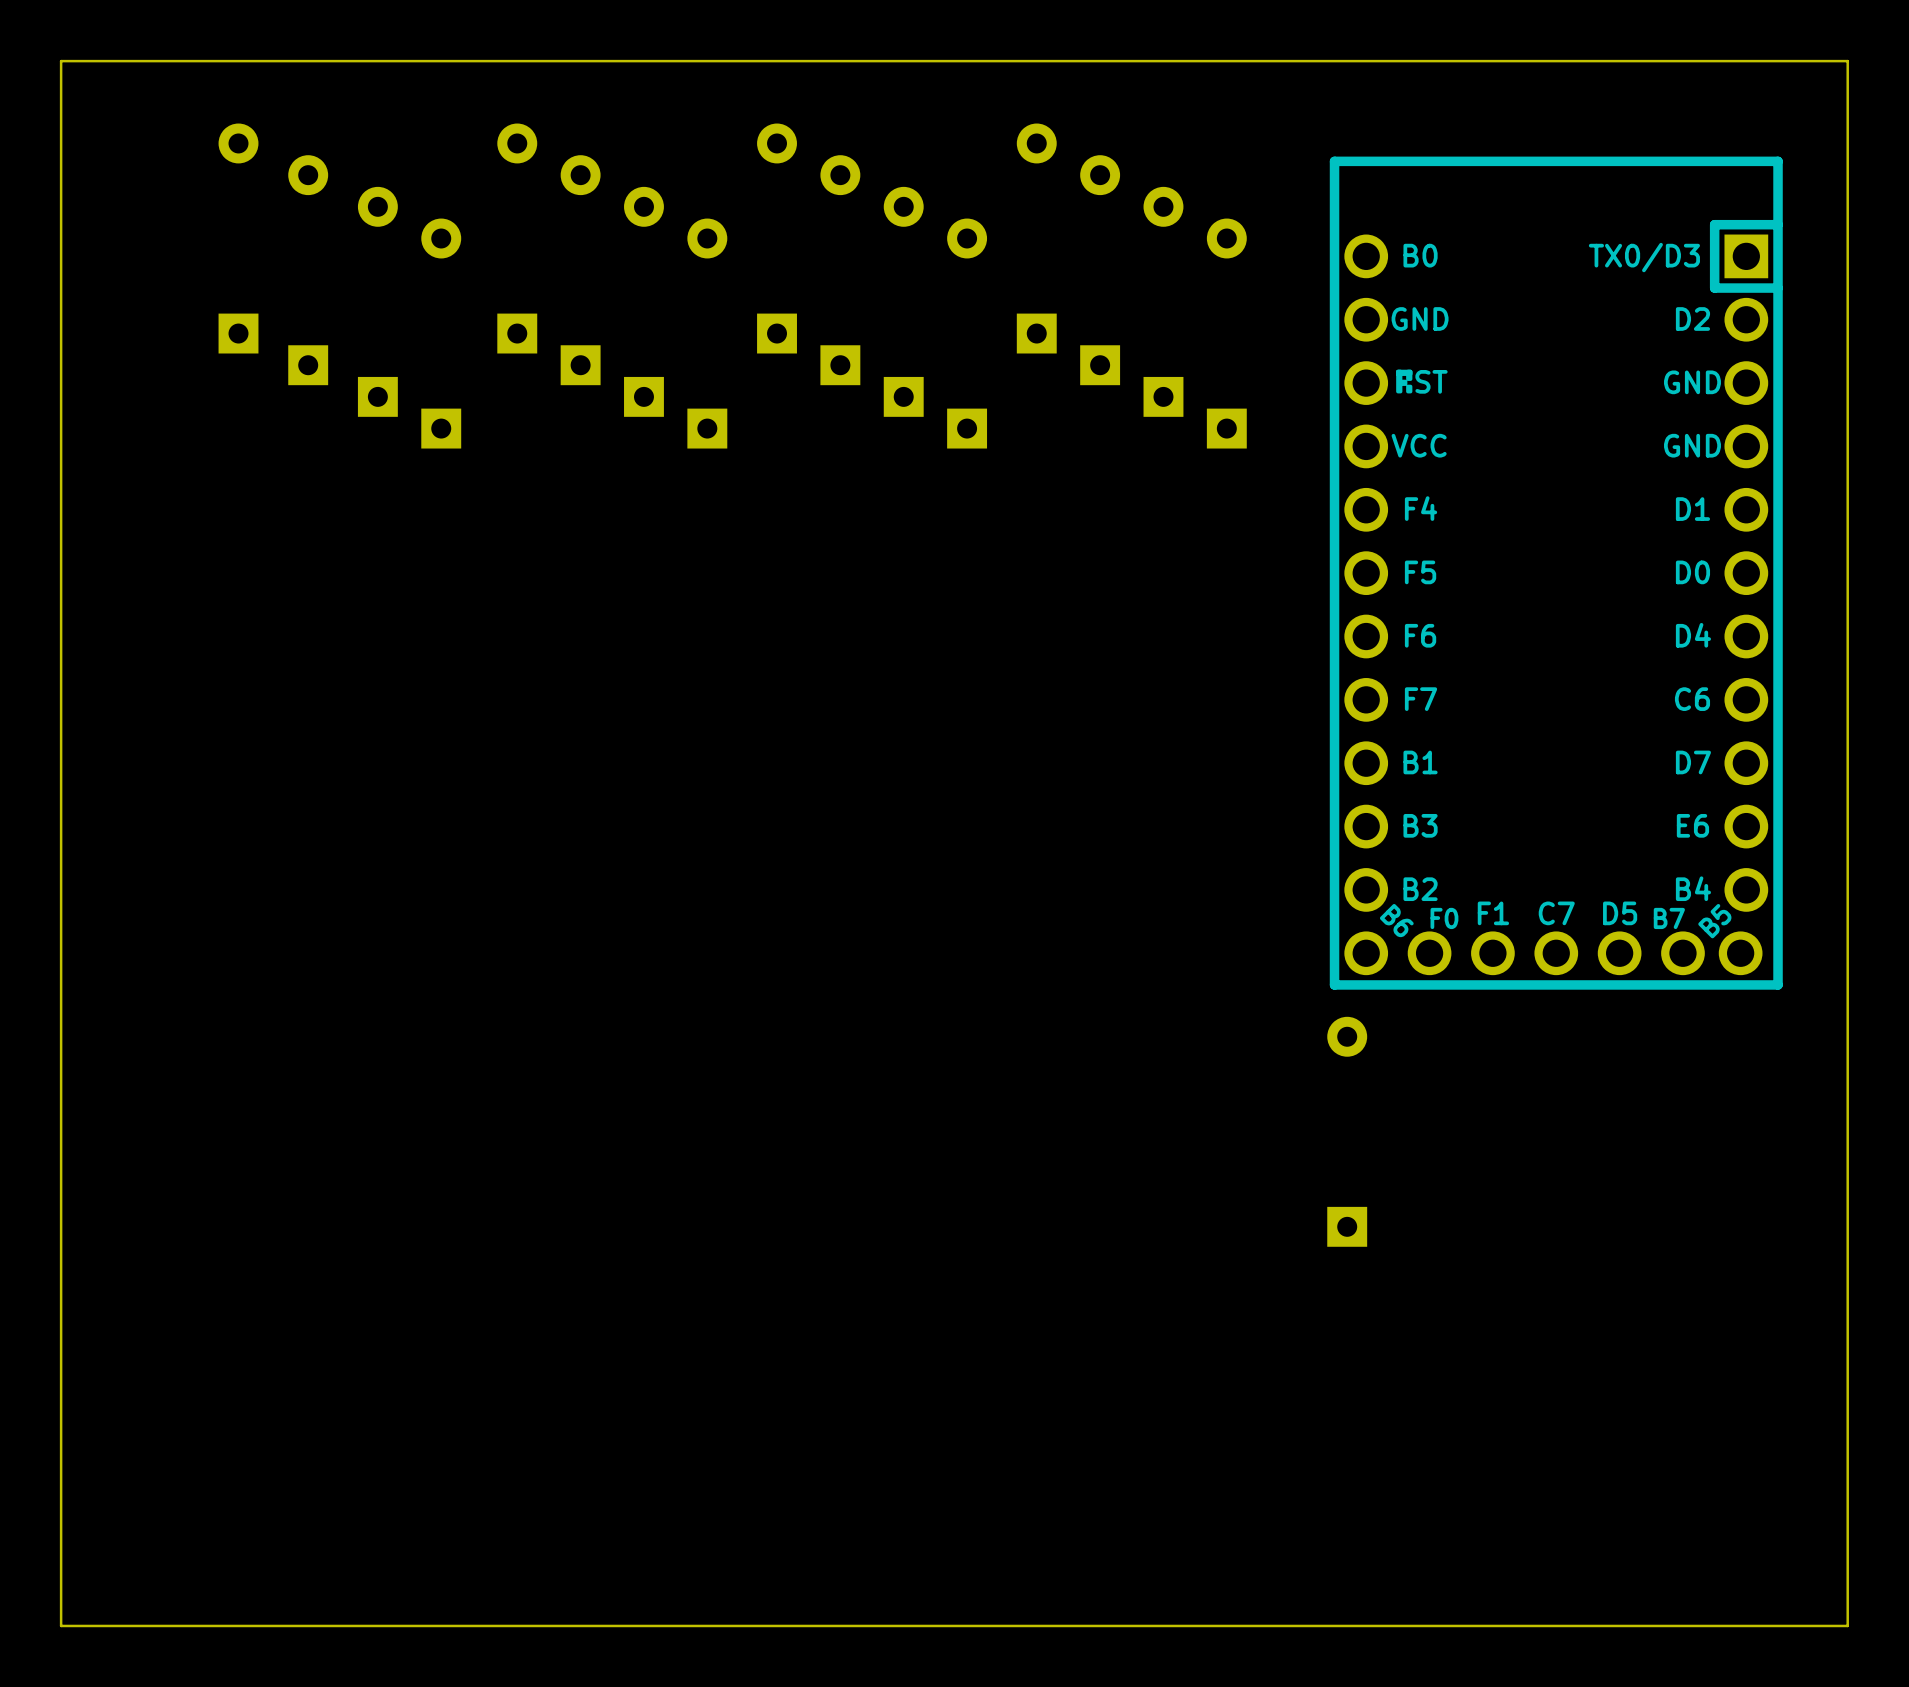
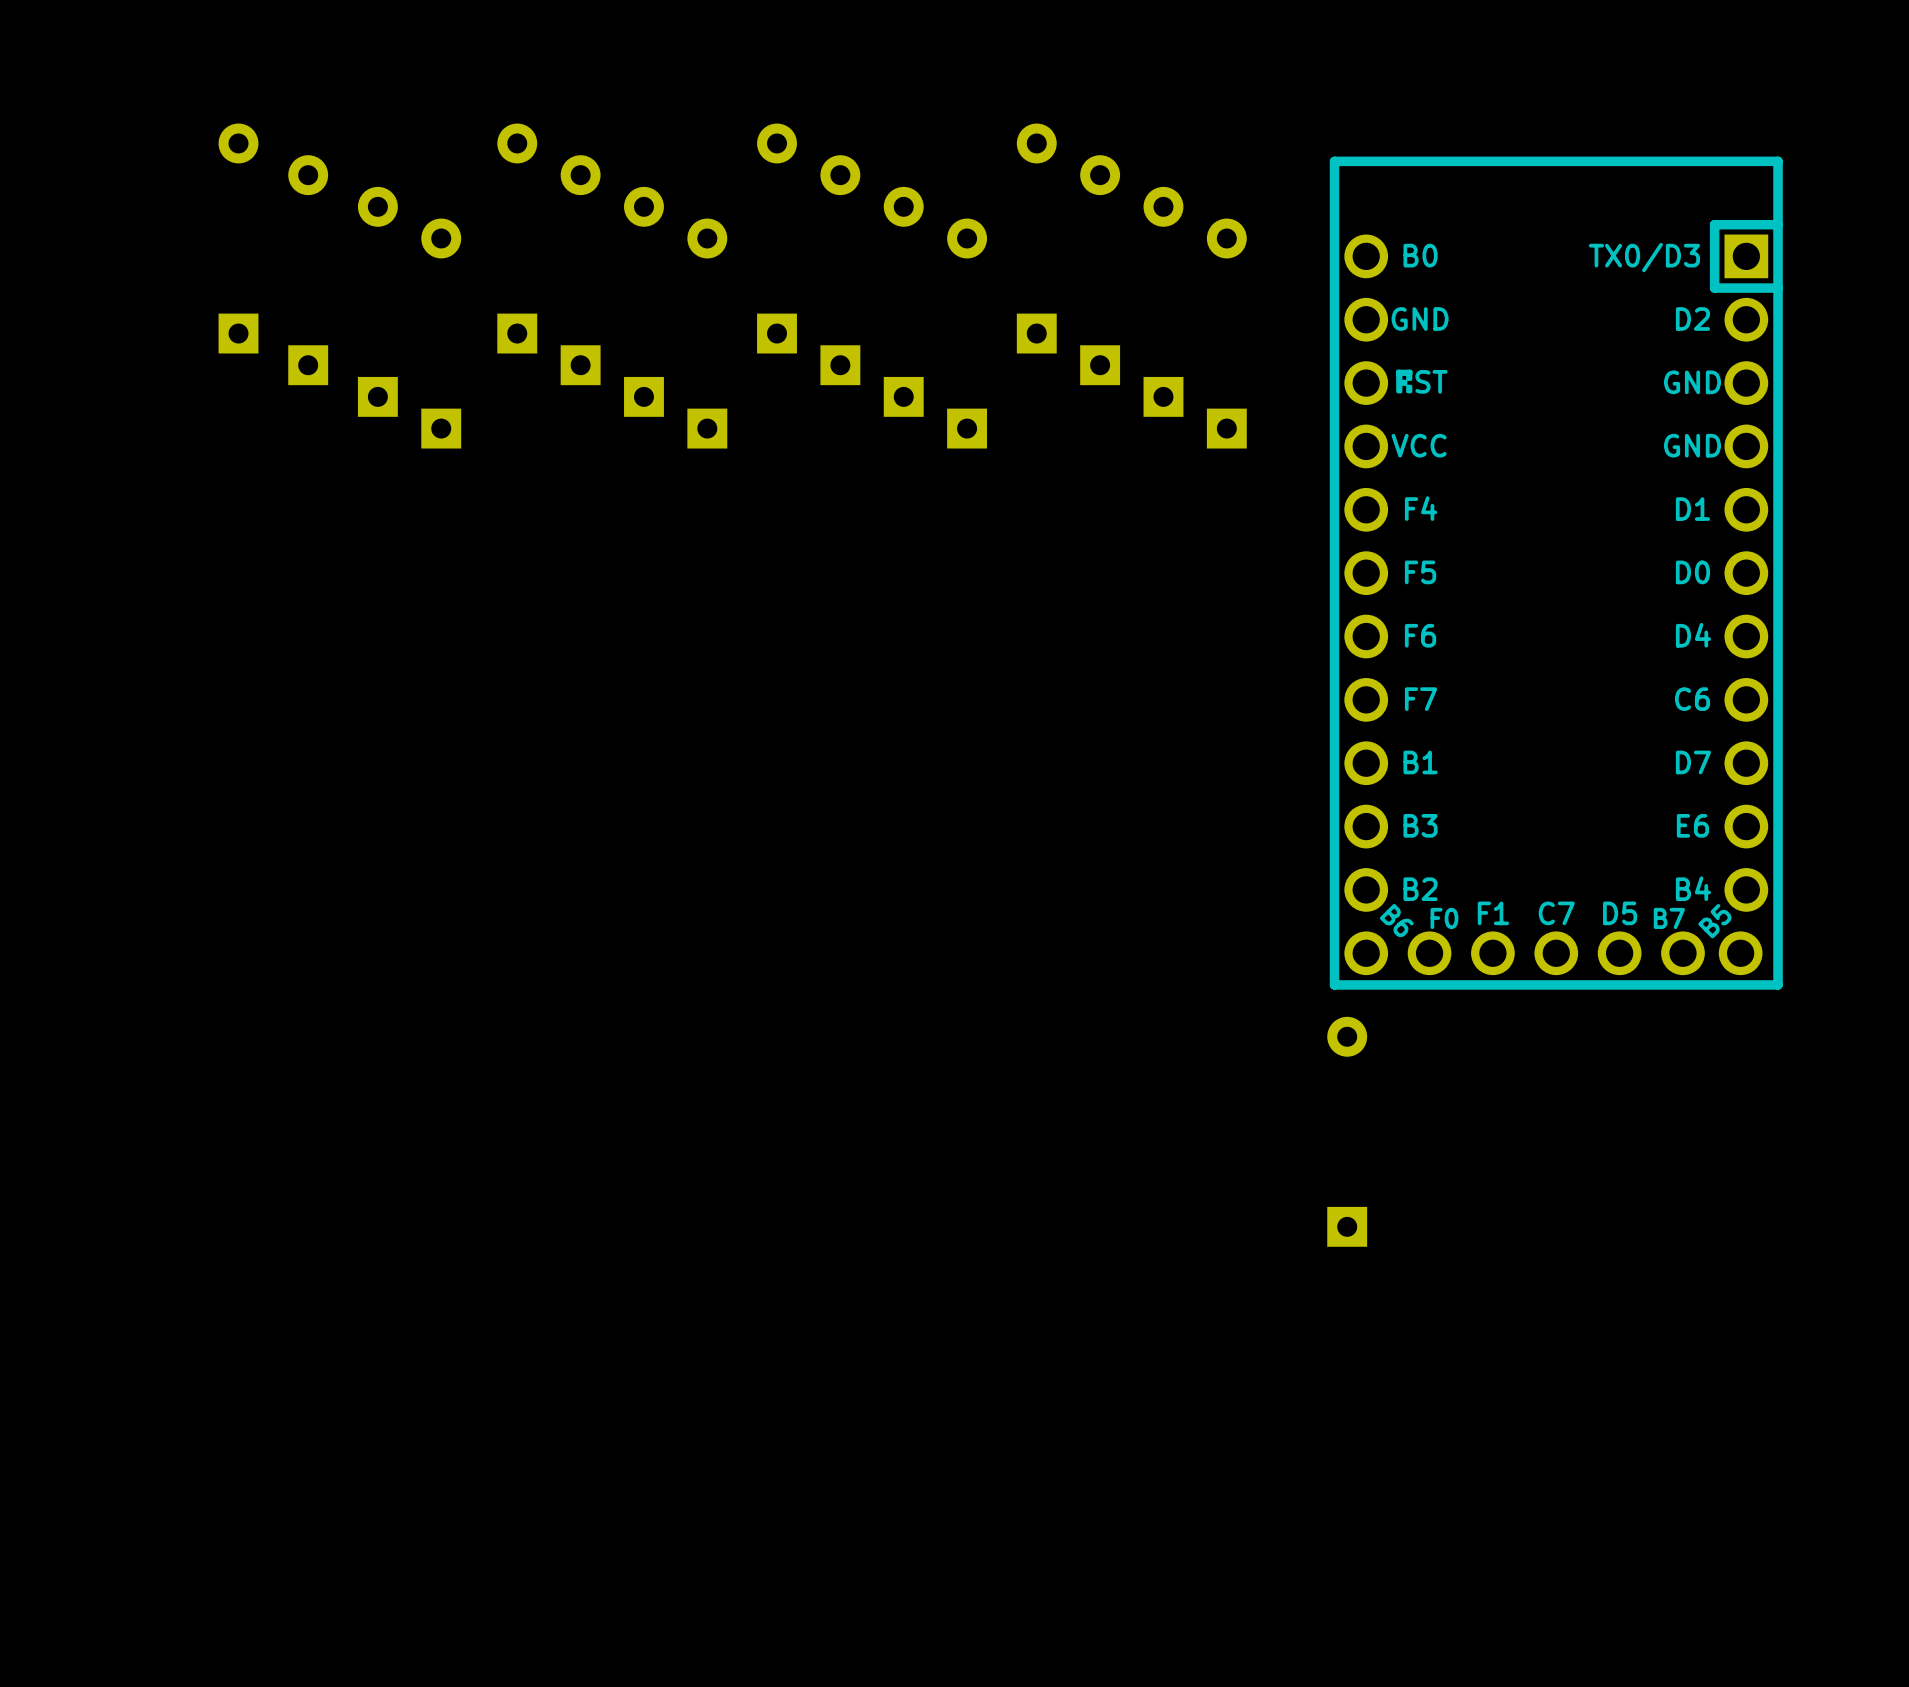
board edge: (1847, 61) (61, 61) (61, 1625) (1847, 1625) (1847, 61) -> none

